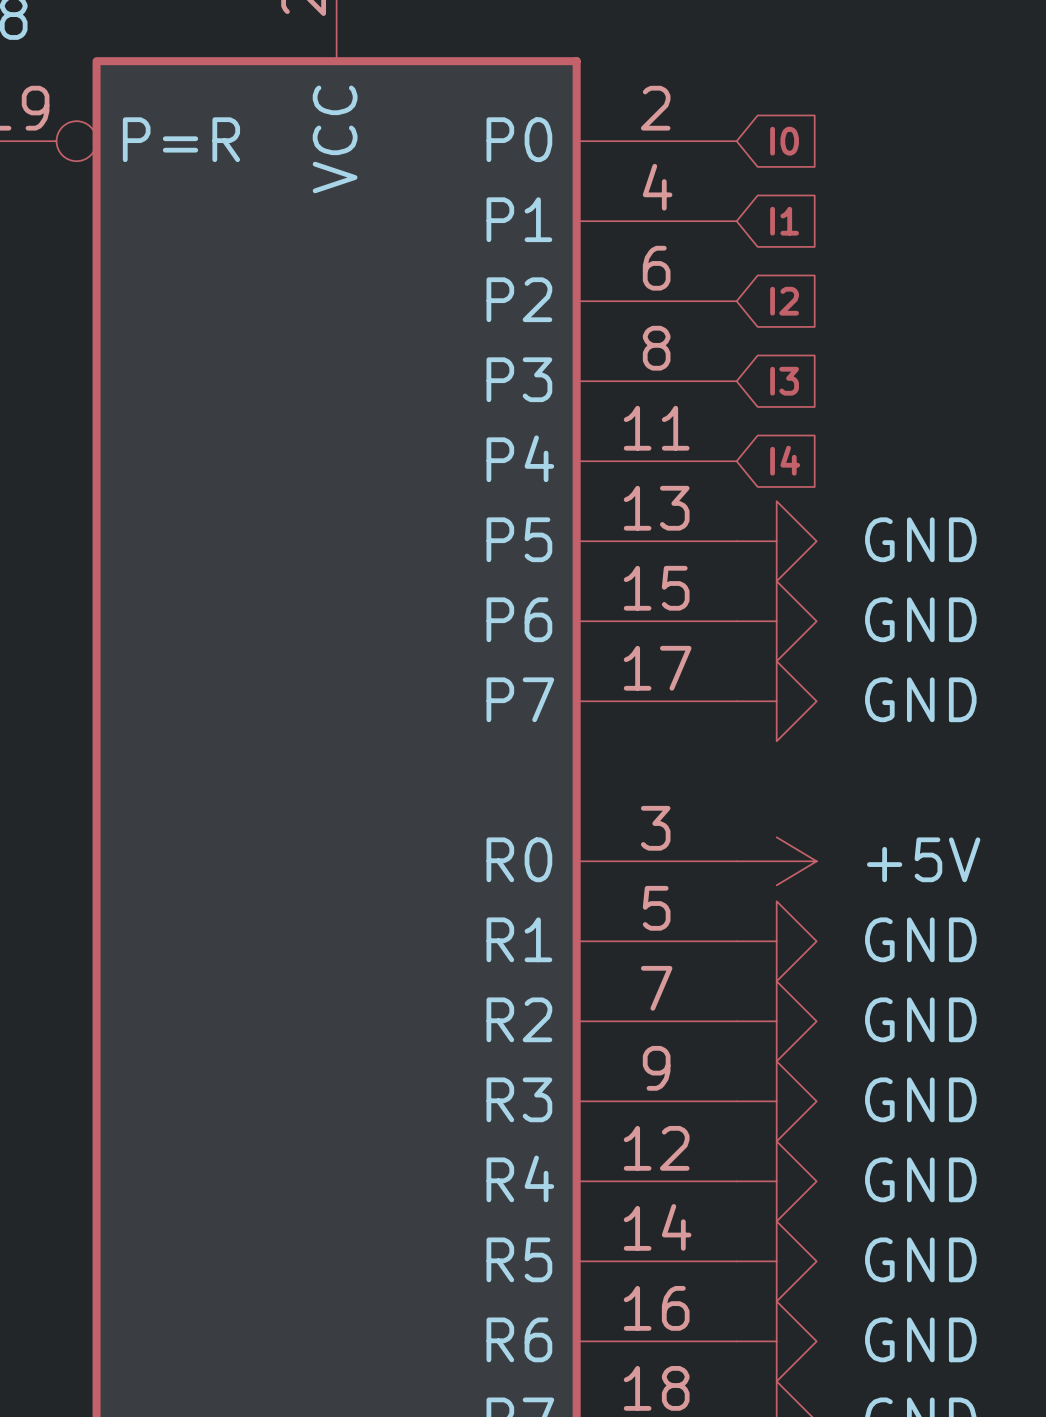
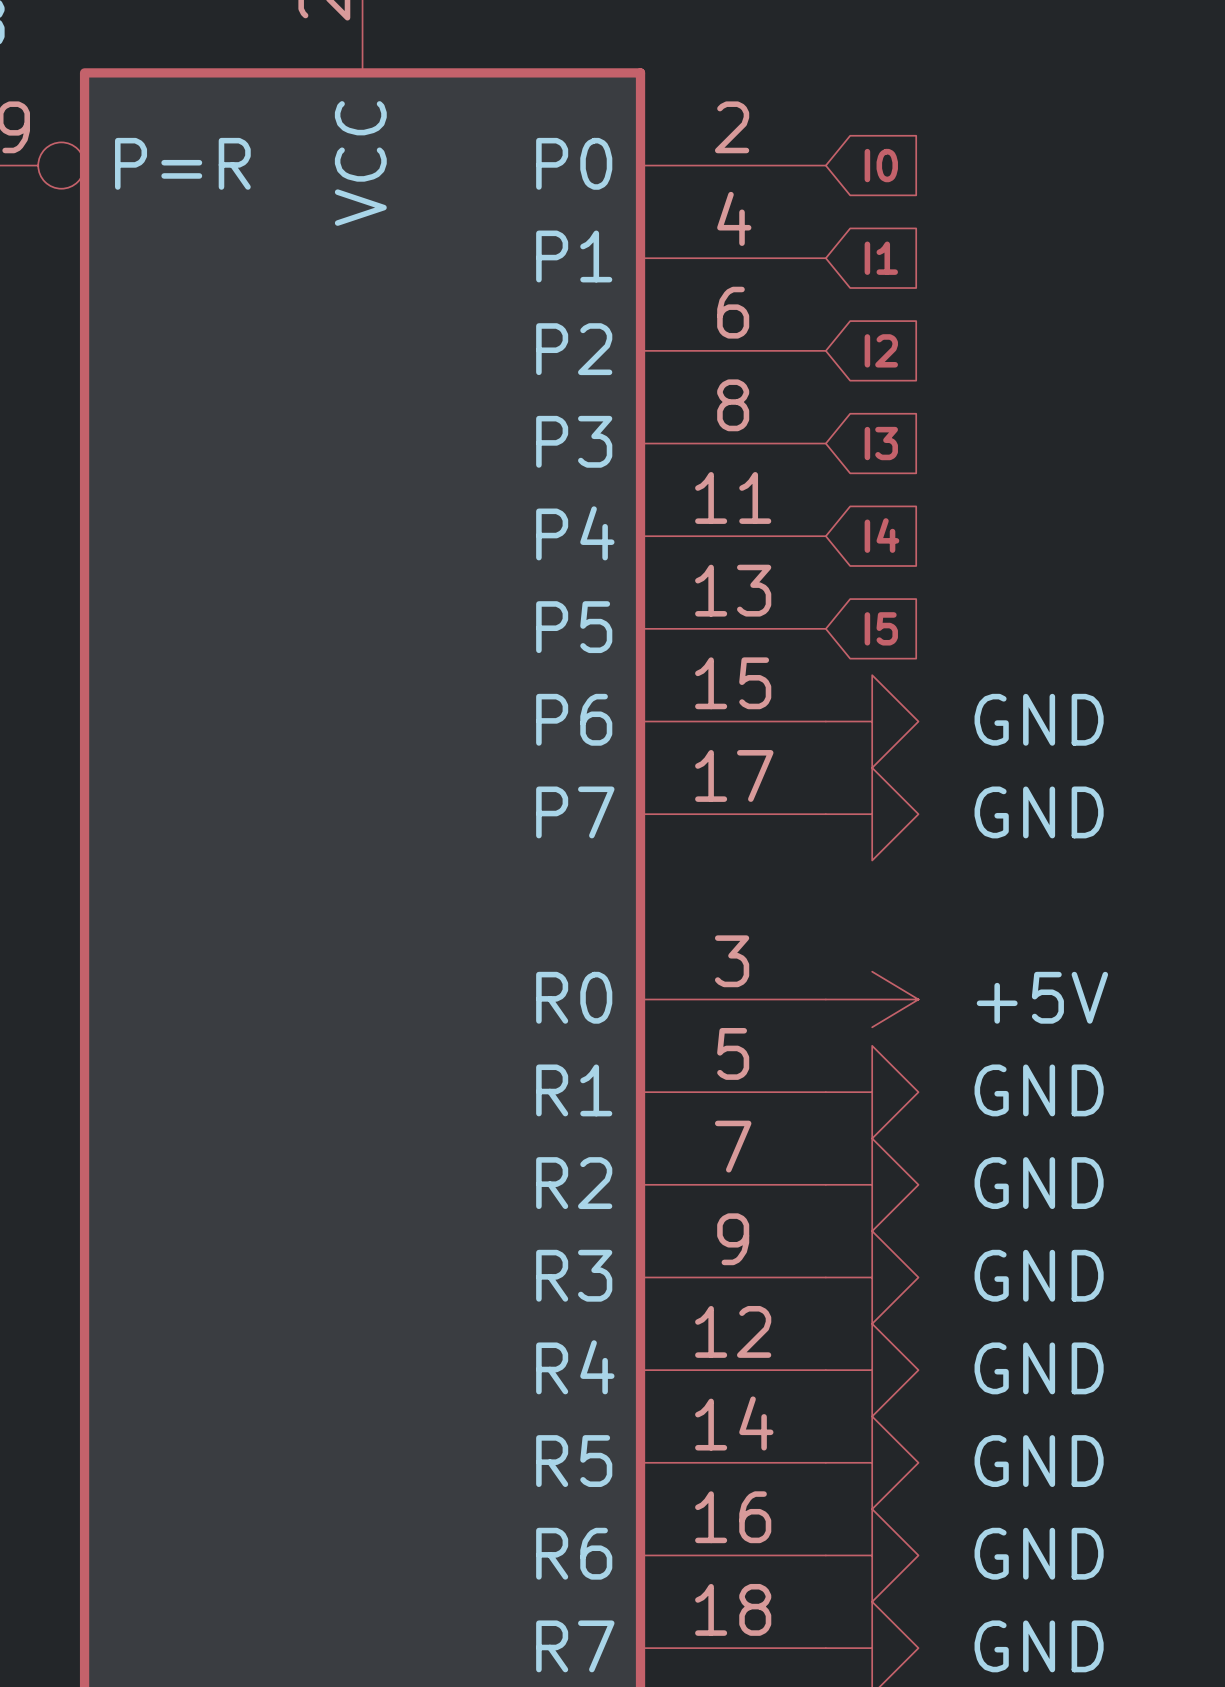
power symbol: GND (776, 541) -> none
global label: none -> I5 (881, 628)

